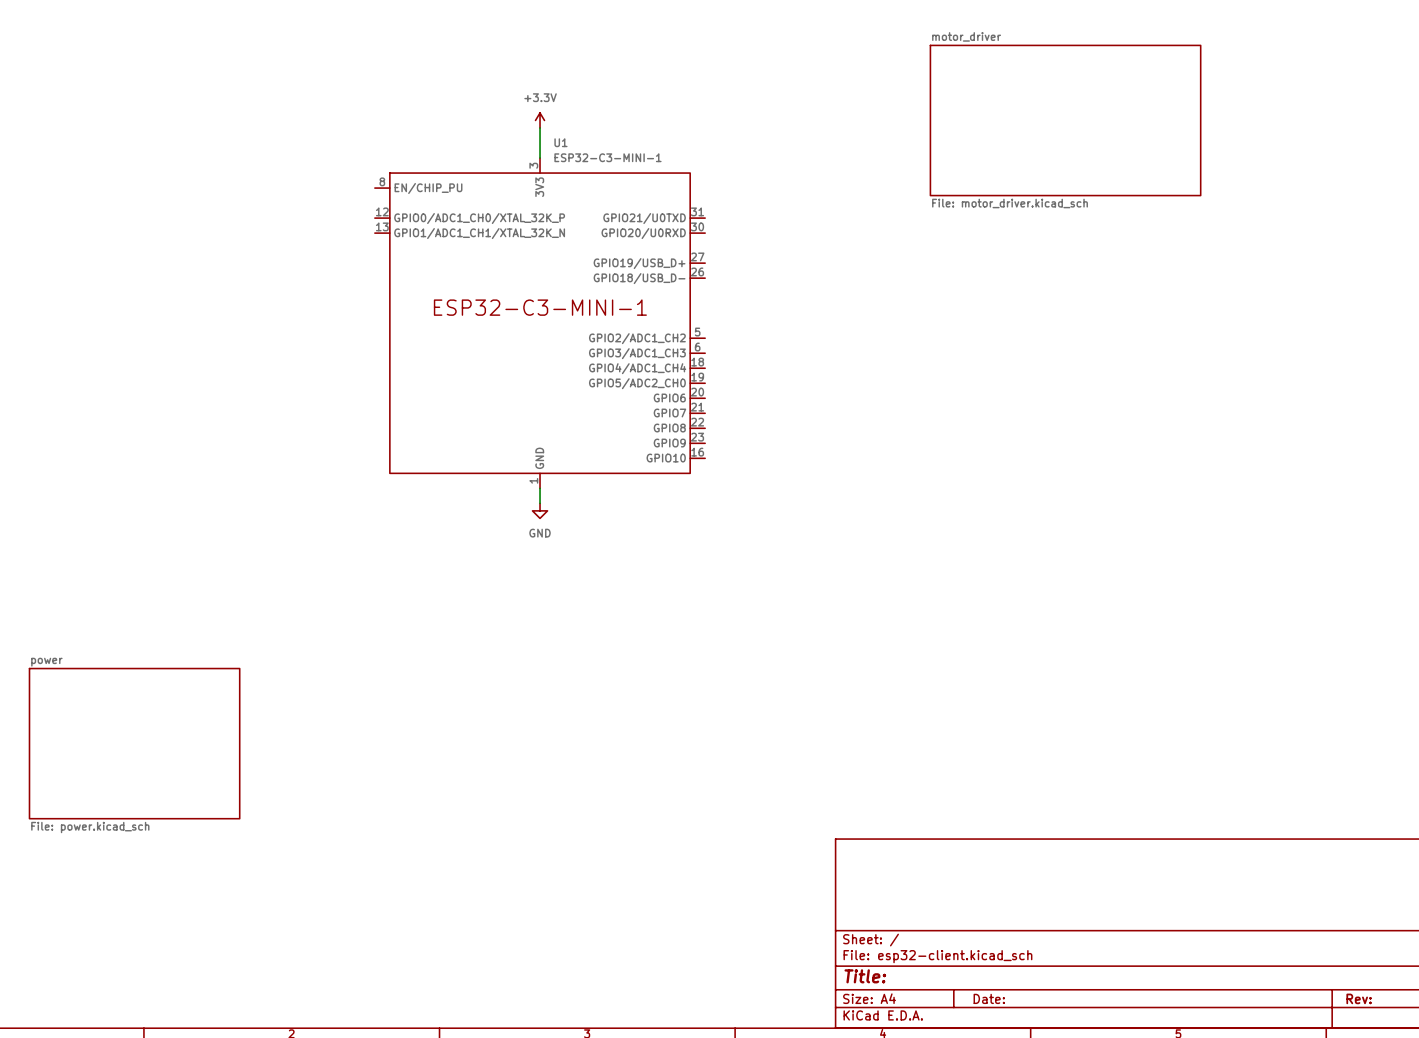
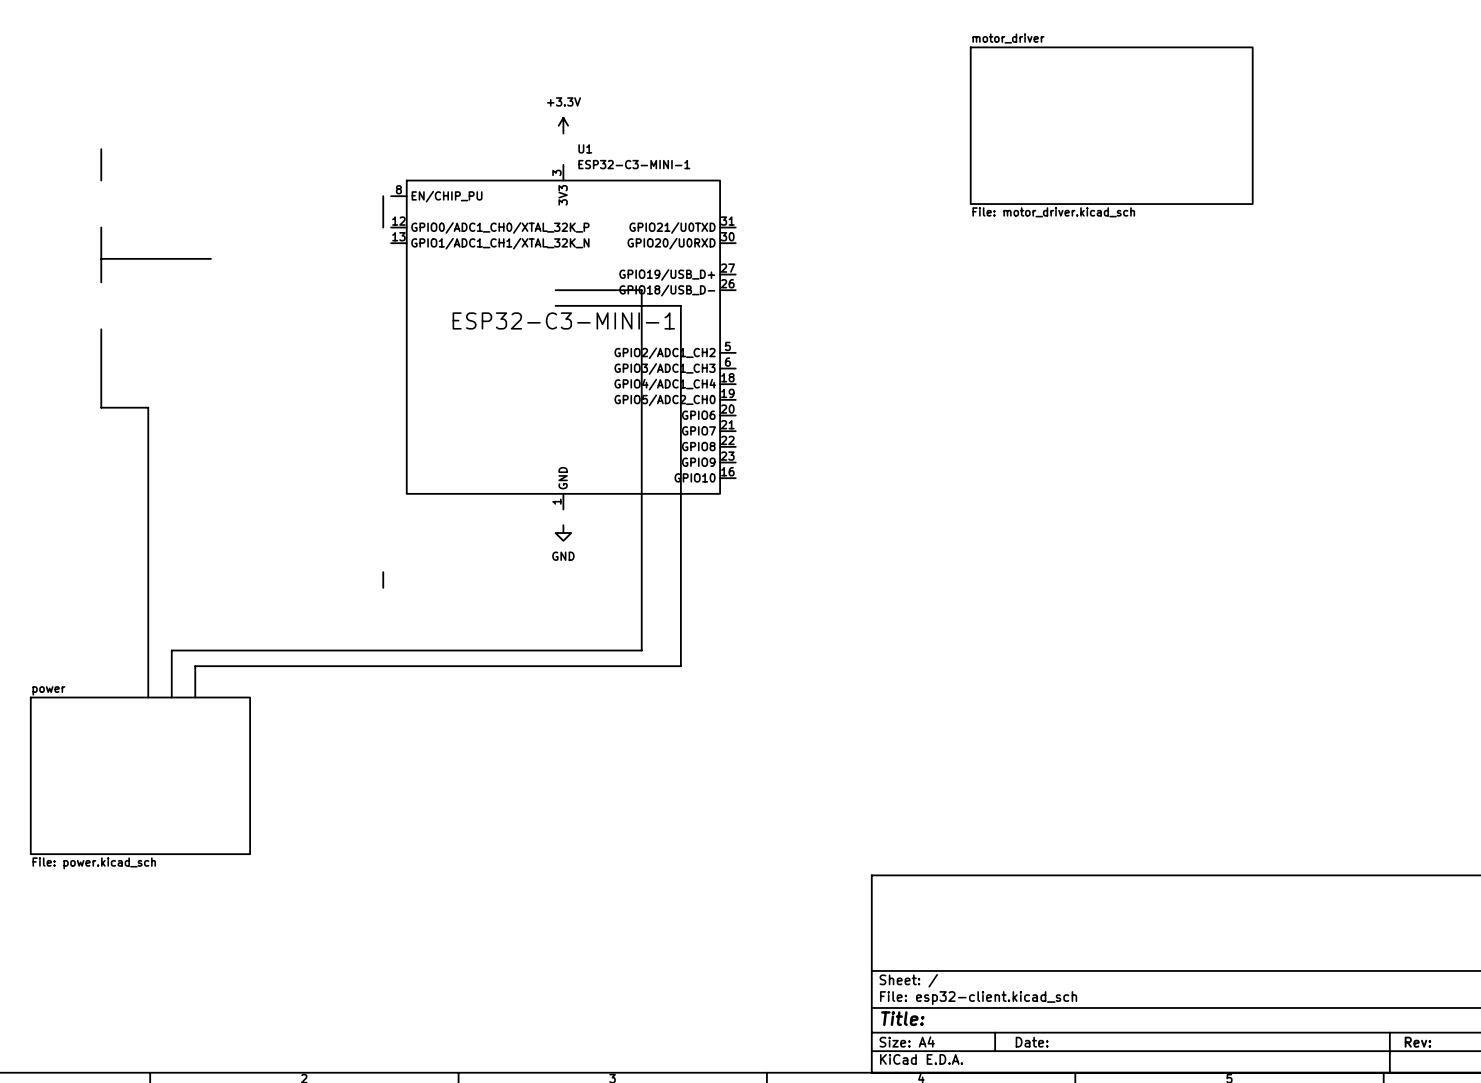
wire: (540, 128) (540, 158) -> none
wire: none -> (101, 149) (101, 180)
wire: none -> (383, 196) (383, 227)
wire: none -> (101, 227) (101, 282)
wire: none -> (101, 258) (210, 258)
wire: none -> (555, 290) (641, 290) (641, 650) (171, 650) (171, 697)
wire: none -> (555, 305) (680, 305) (680, 666) (195, 666) (195, 697)
wire: none -> (101, 329) (101, 407) (148, 407) (148, 697)
wire: (540, 488) (540, 503) -> none
wire: none -> (383, 572) (383, 587)

